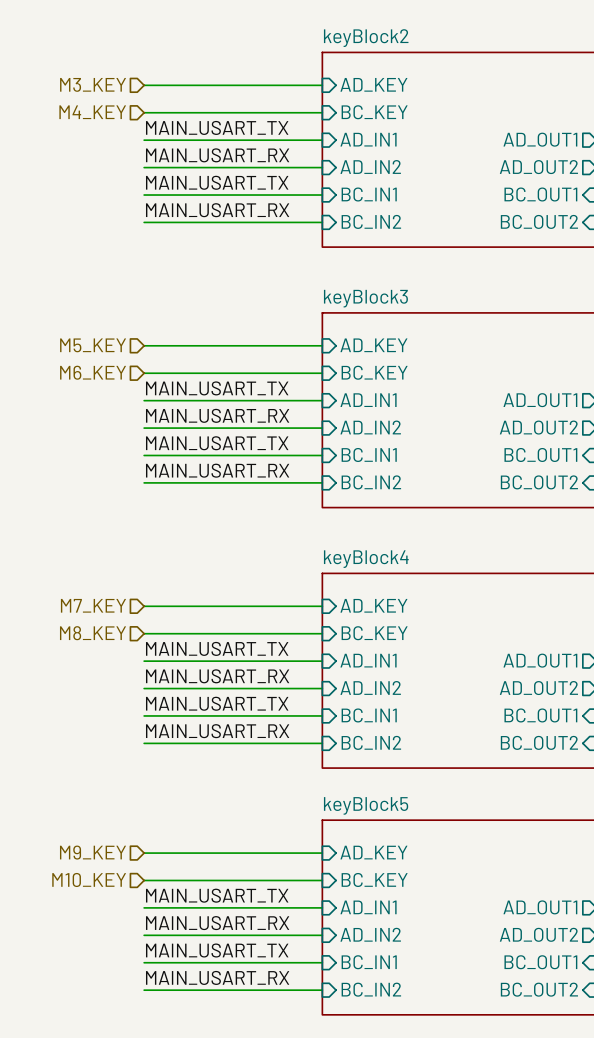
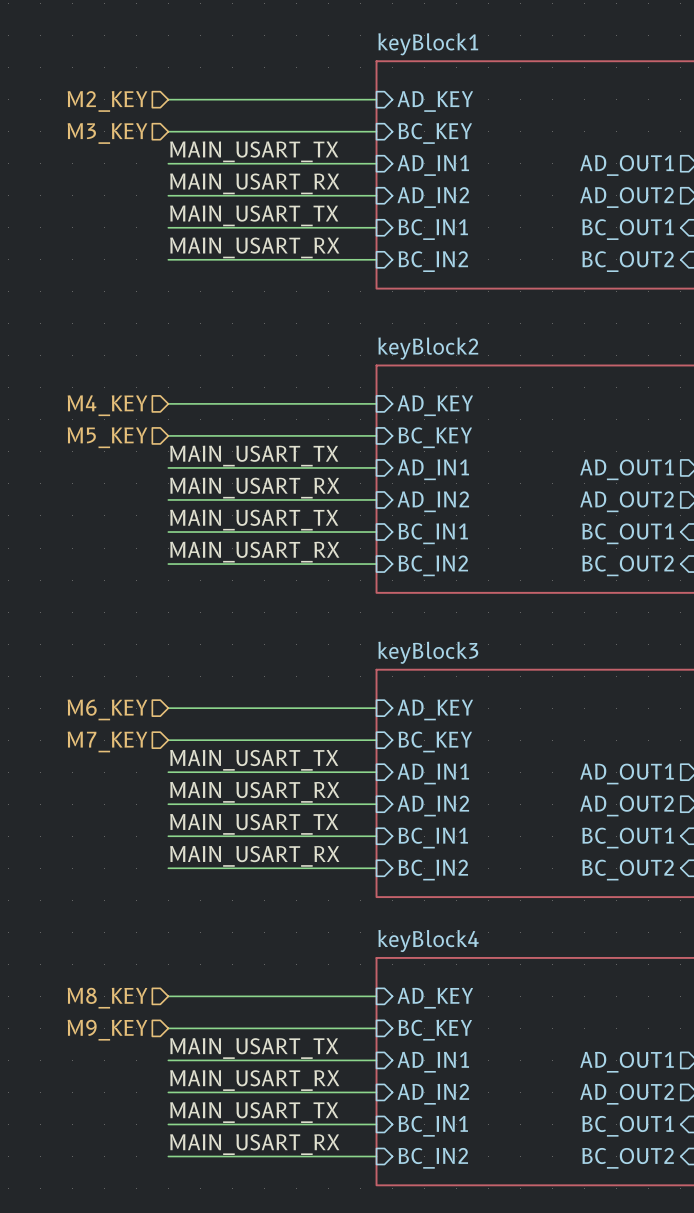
sheet keyBlock2 name: keyBlock2 (366, 38) -> keyBlock1 (428, 44)
hierarchical label: M3_KEY (93, 84) -> M2_KEY (107, 101)
hierarchical label: M4_KEY (92, 112) -> M3_KEY (107, 133)
sheet keyBlock3 name: keyBlock3 (365, 298) -> keyBlock2 (428, 348)
hierarchical label: M5_KEY (93, 345) -> M4_KEY (107, 405)
hierarchical label: M6_KEY (93, 372) -> M5_KEY (107, 437)
sheet keyBlock4 name: keyBlock4 (366, 559) -> keyBlock3 (428, 652)
hierarchical label: M7_KEY (93, 605) -> M6_KEY (107, 709)
hierarchical label: M8_KEY (92, 633) -> M7_KEY (107, 741)
sheet keyBlock5 name: keyBlock5 (366, 805) -> keyBlock4 (428, 941)
hierarchical label: M9_KEY (92, 852) -> M8_KEY (107, 998)
hierarchical label: M10_KEY (89, 879) -> M9_KEY (107, 1030)

